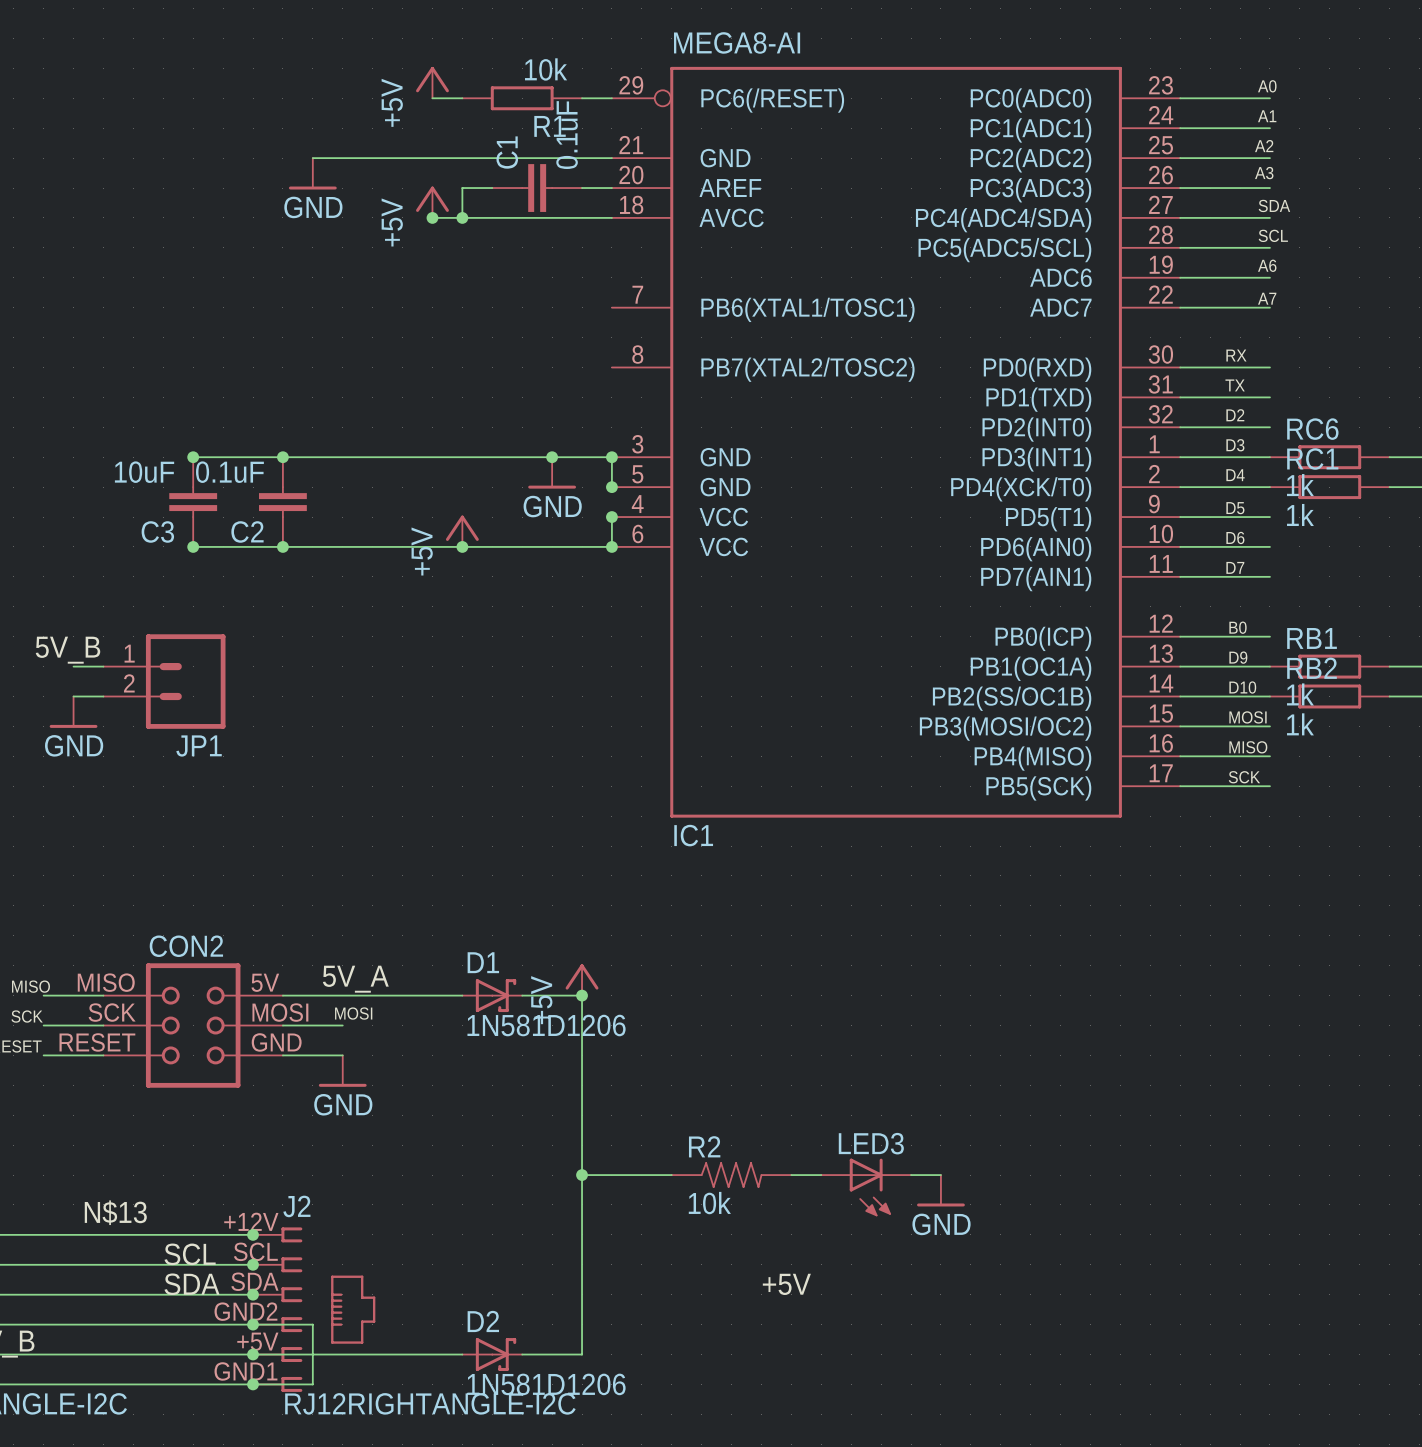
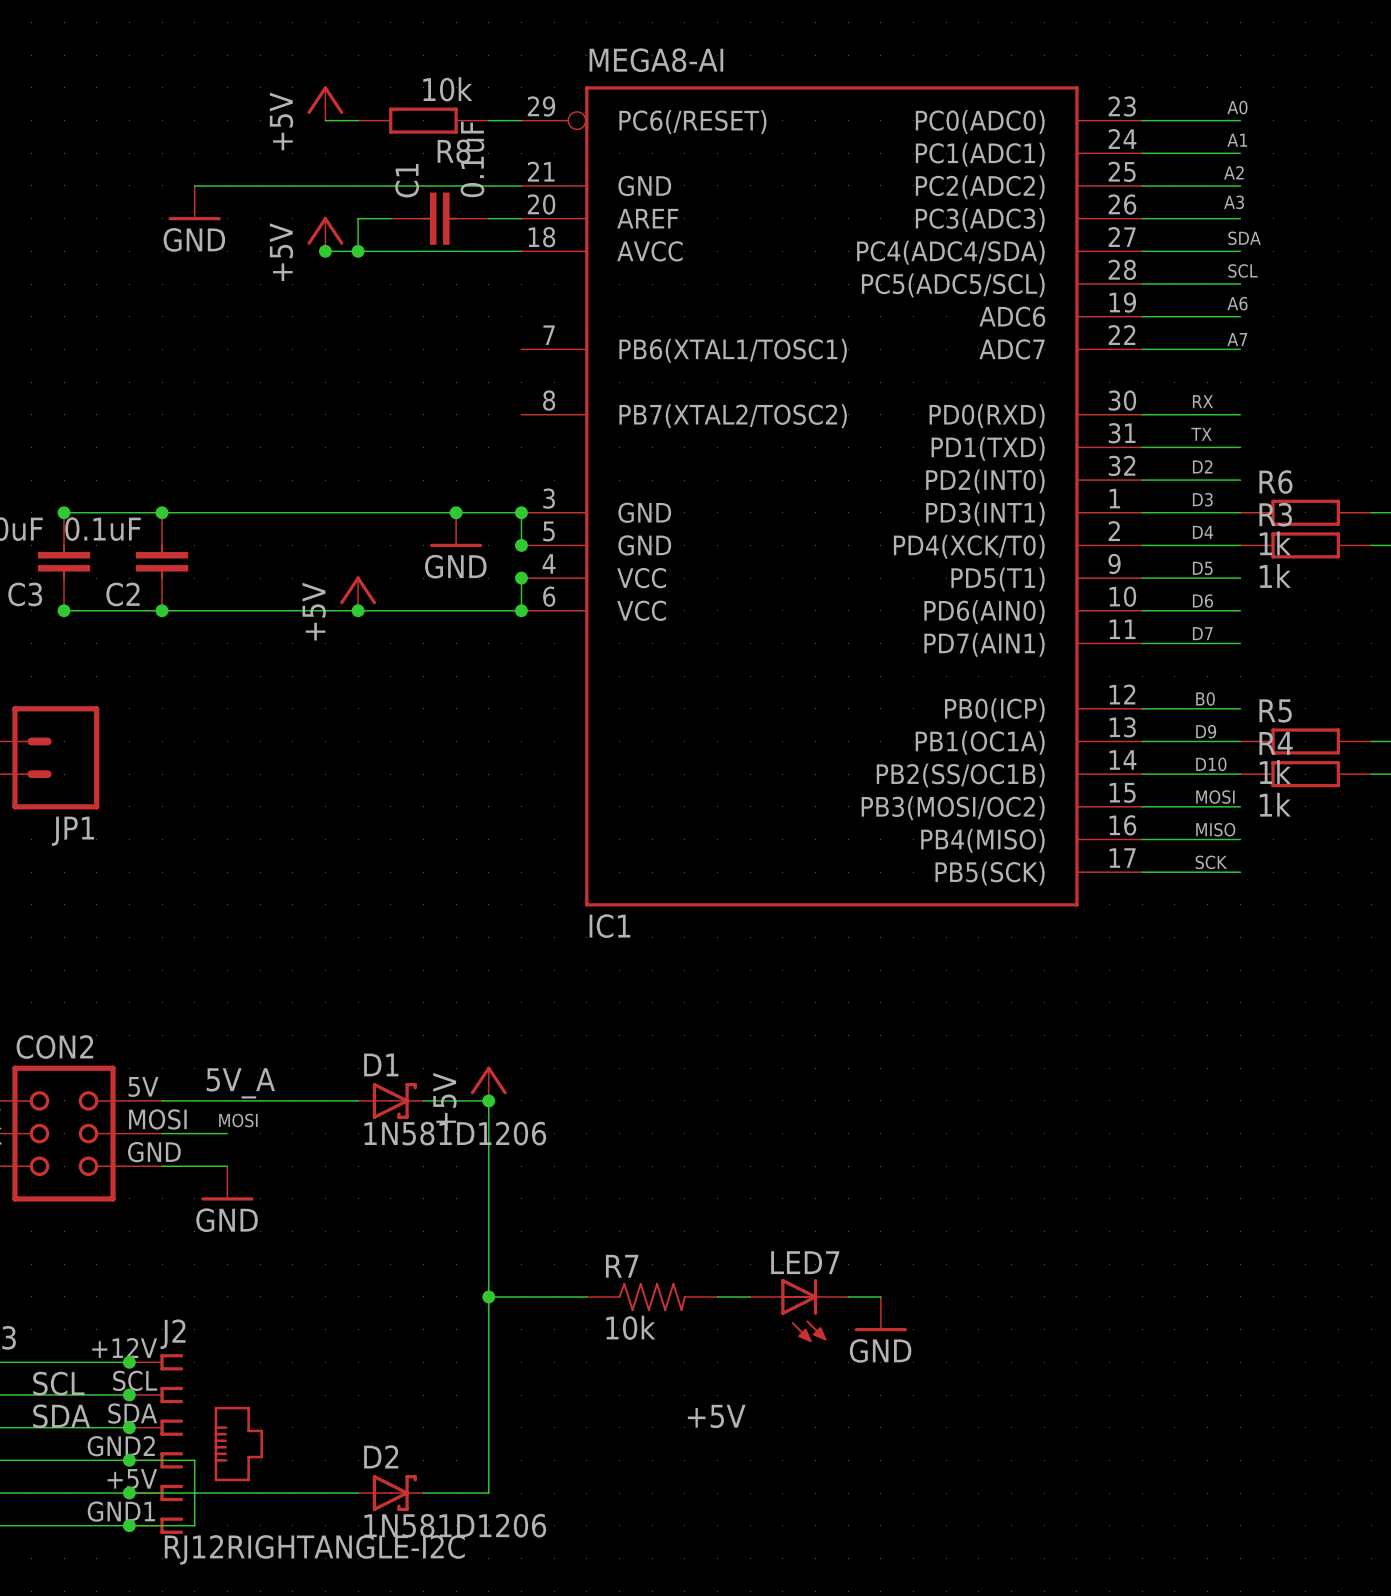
R1 name: R1 (550, 126) -> R8 (454, 151)
RC6 name: RC6 (1312, 429) -> R6 (1275, 482)
RC1 name: RC1 (1312, 459) -> R3 (1275, 514)
RB1 name: RB1 (1312, 638) -> R5 (1275, 710)
RB2 name: RB2 (1312, 668) -> R4 (1276, 743)
LED3 name: LED3 (871, 1143) -> LED7 (805, 1262)
R2 name: R2 (704, 1146) -> R7 (622, 1266)

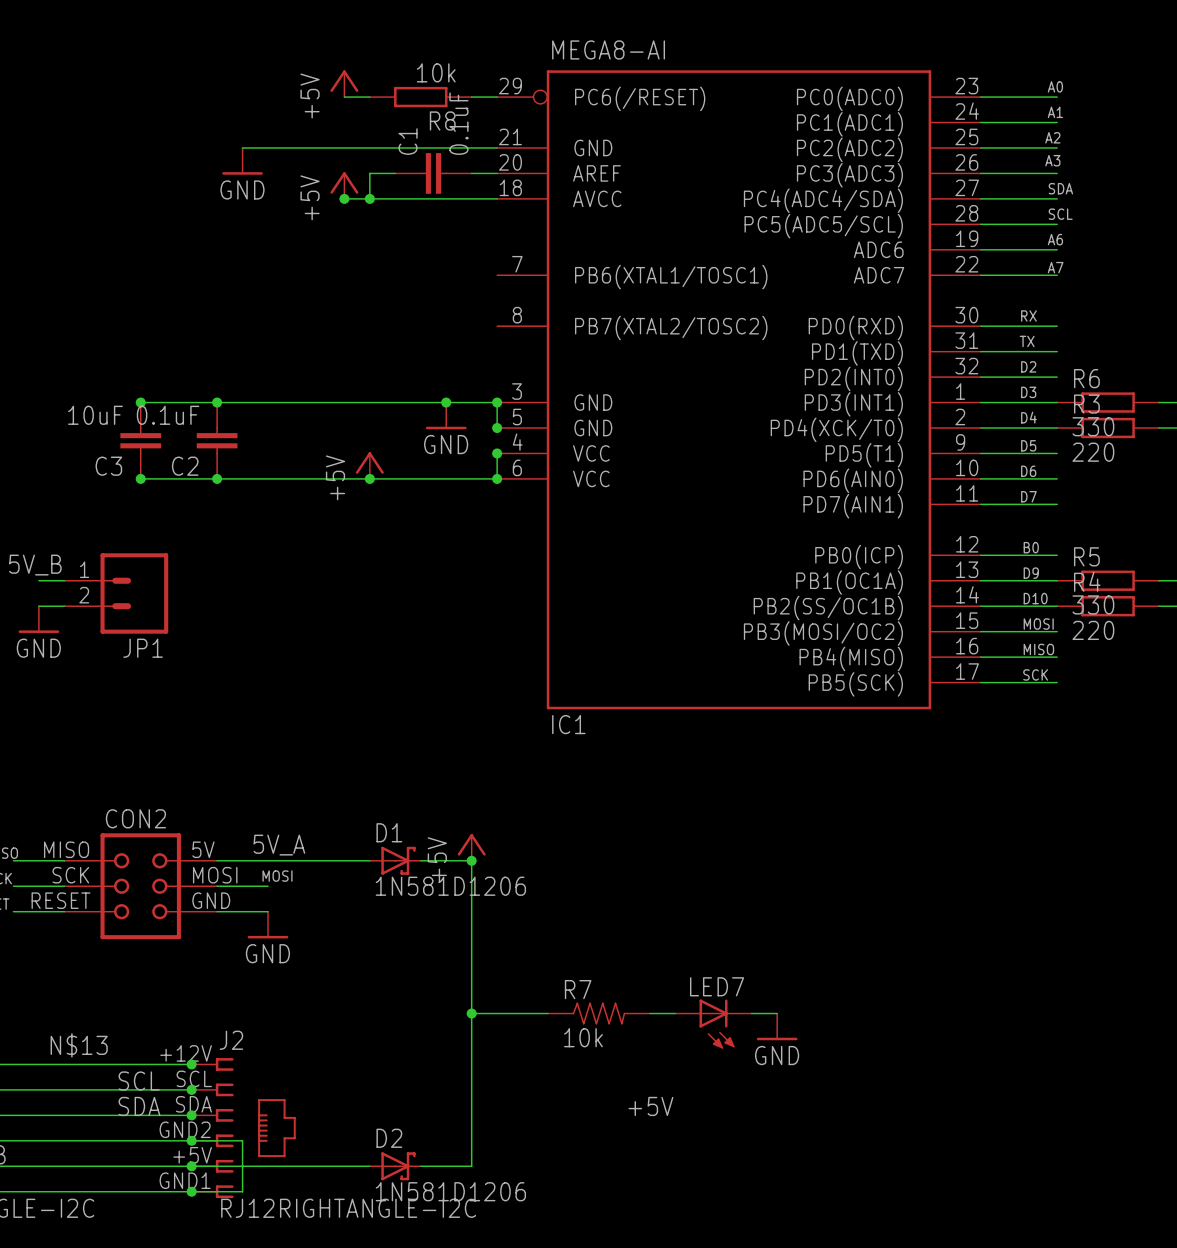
R6 value: 1k (1275, 543) -> 330 (1093, 426)
R3 value: 1k (1275, 575) -> 220 (1093, 452)
R5 value: 1k (1275, 772) -> 330 (1093, 604)
R4 value: 1k (1275, 804) -> 220 (1093, 630)

